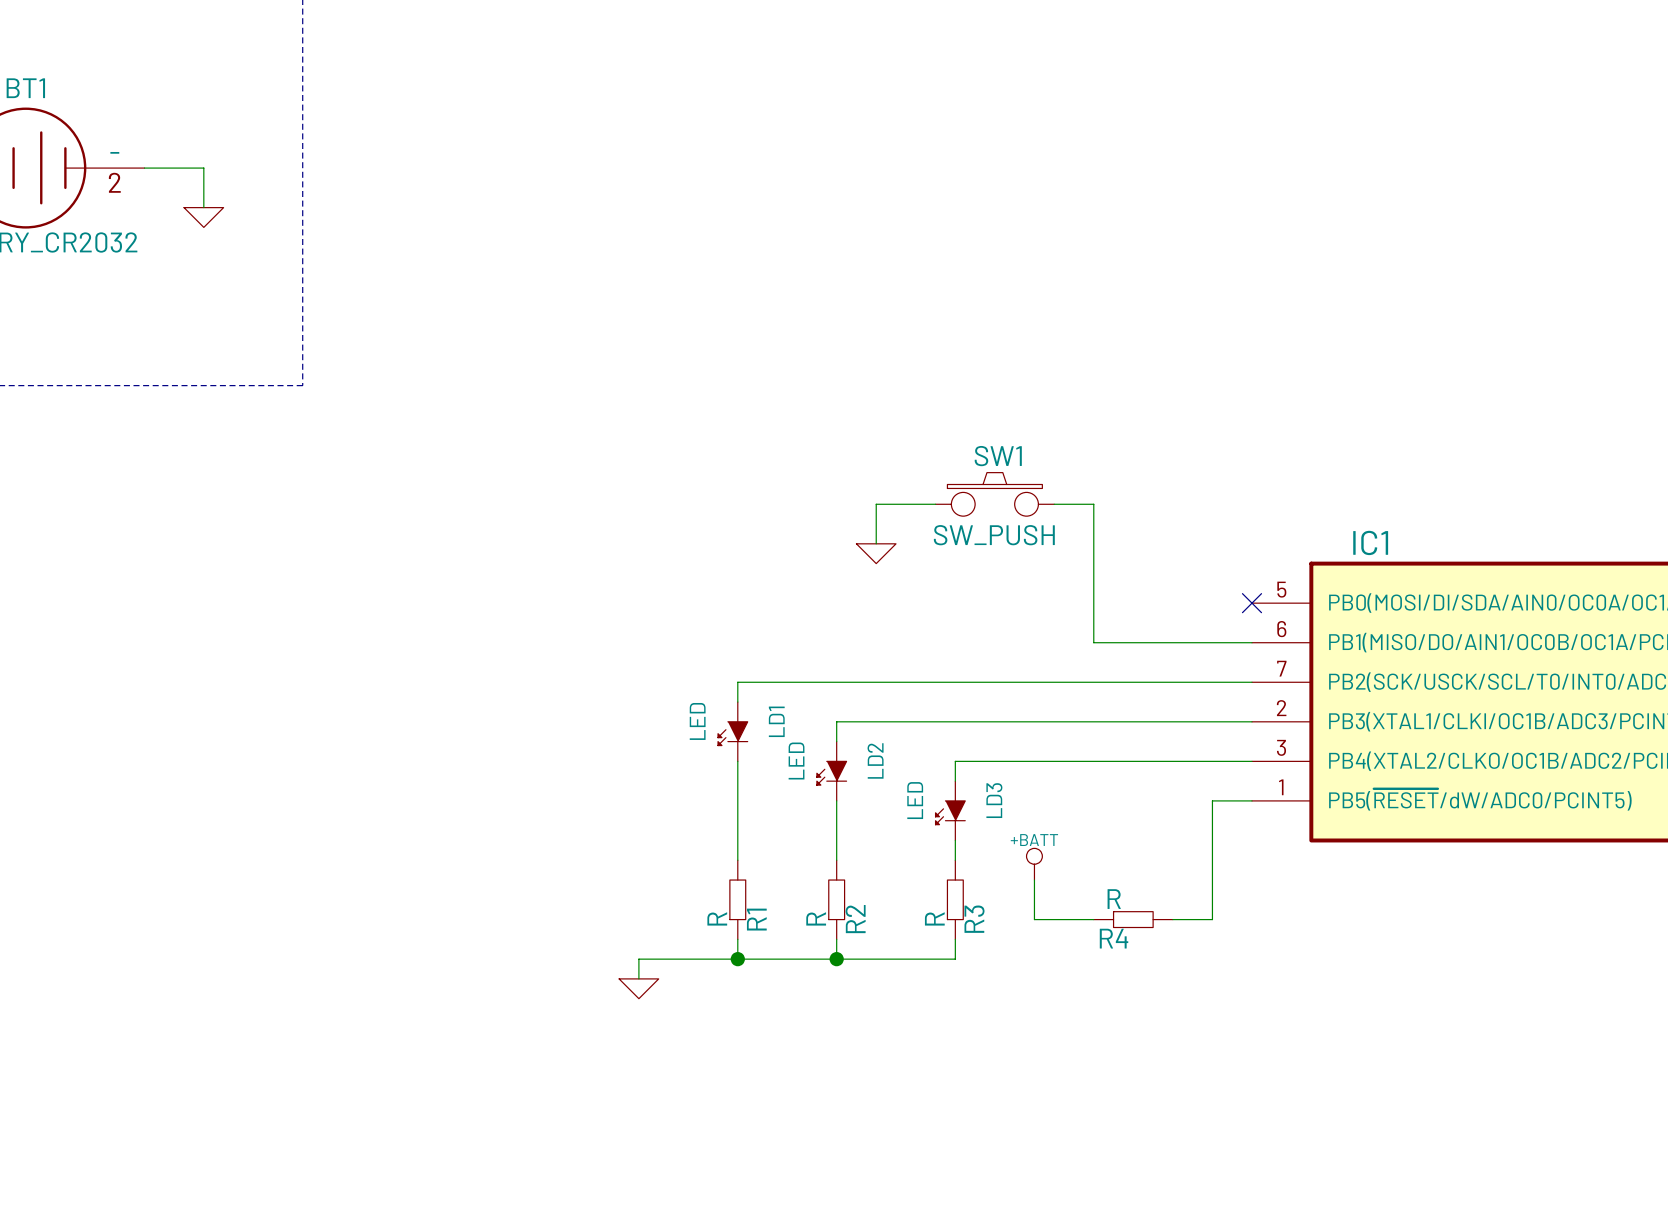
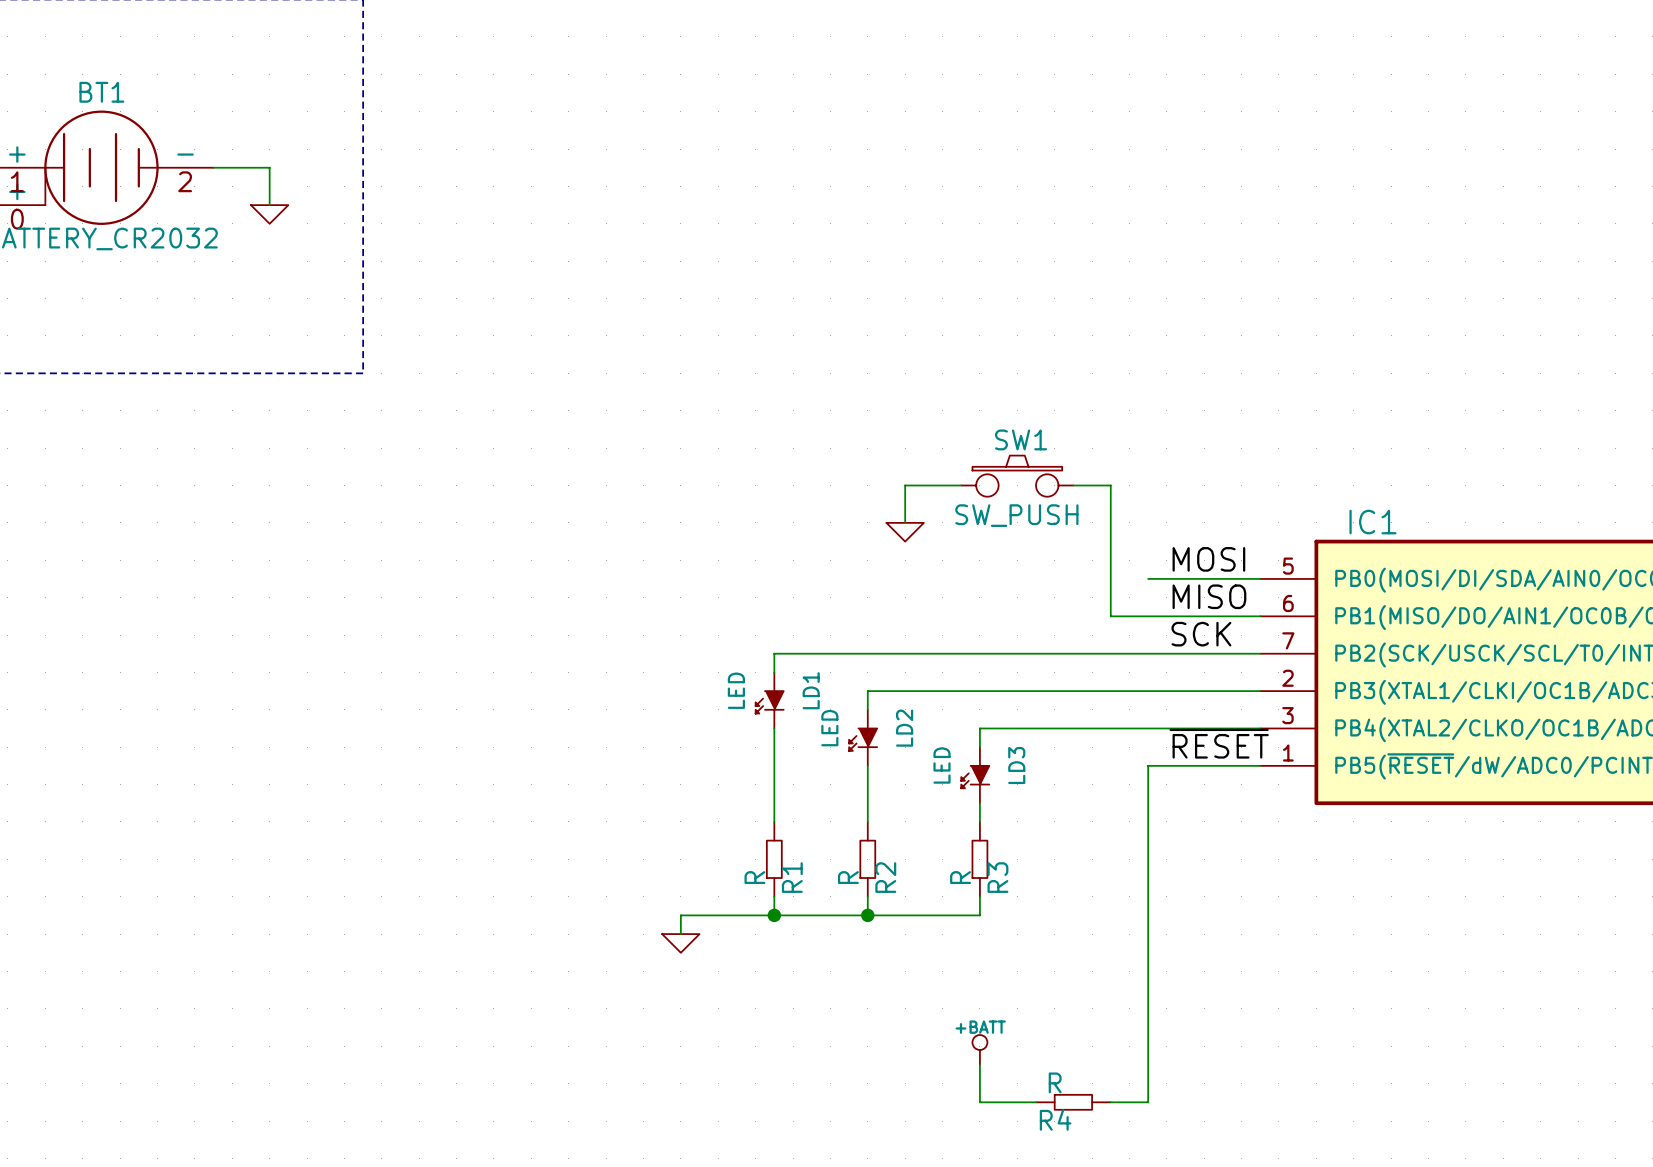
label: none -> MOSI (1208, 559)
wire: none -> (1148, 578) (1260, 578)
no-connect mark: (1251, 603) -> none
label: none -> MISO (1209, 596)
label: none -> SCK (1201, 634)
label: none -> ~{RESET} (1219, 743)
wire: (1212, 800) (1212, 919) (1172, 919) -> (1222, 765) (1148, 765) (1148, 1102) (1110, 1102)
power symbol position: +BATT (1034, 864) -> +BATT (979, 1049)
wire: (1034, 880) (1034, 919) (1093, 919) -> (979, 1064) (979, 1102) (1036, 1102)
R4 position: (1133, 919) -> (1073, 1102)

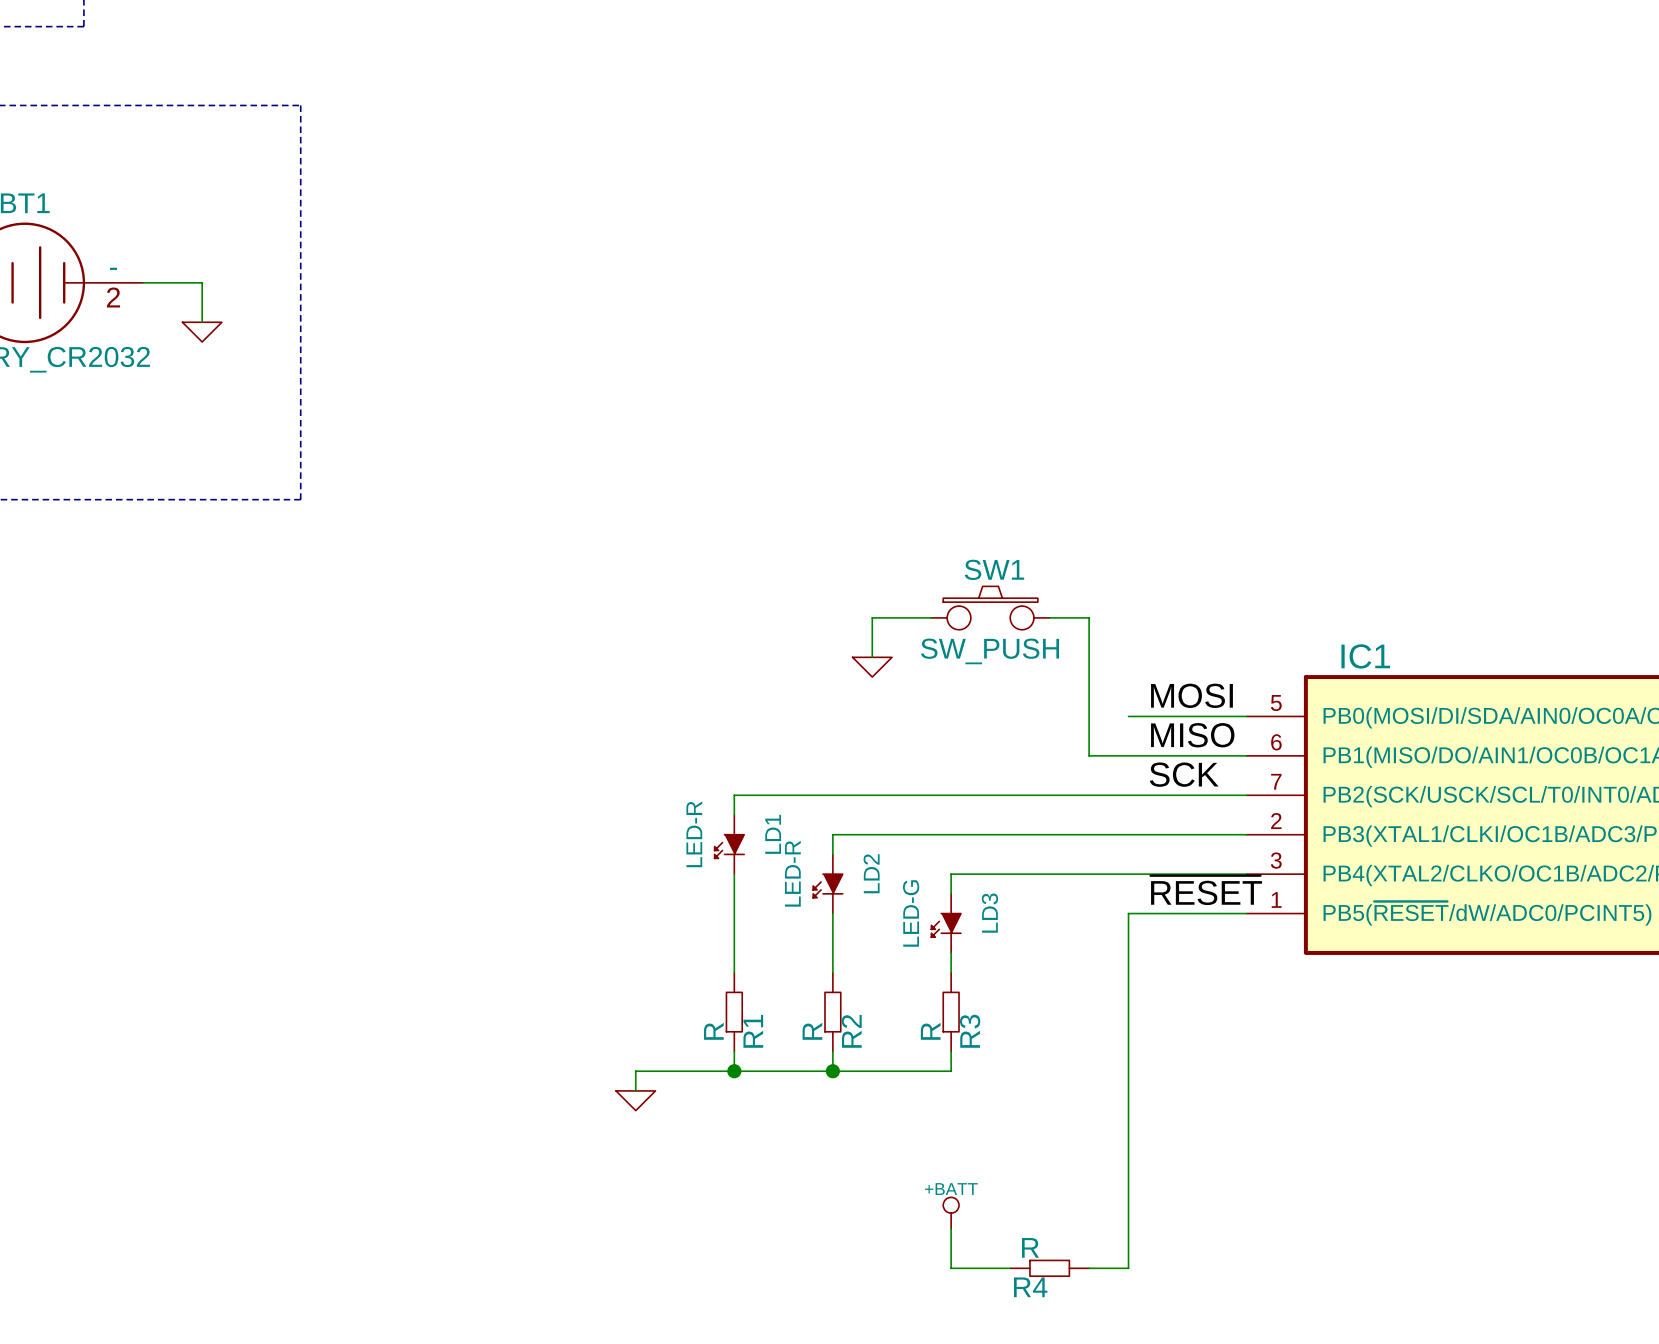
LD1 value: LED (736, 690) -> LED-R (694, 834)
LD2 value: LED (829, 728) -> LED-R (792, 873)
LD3 value: LED (941, 765) -> LED-G (911, 913)

